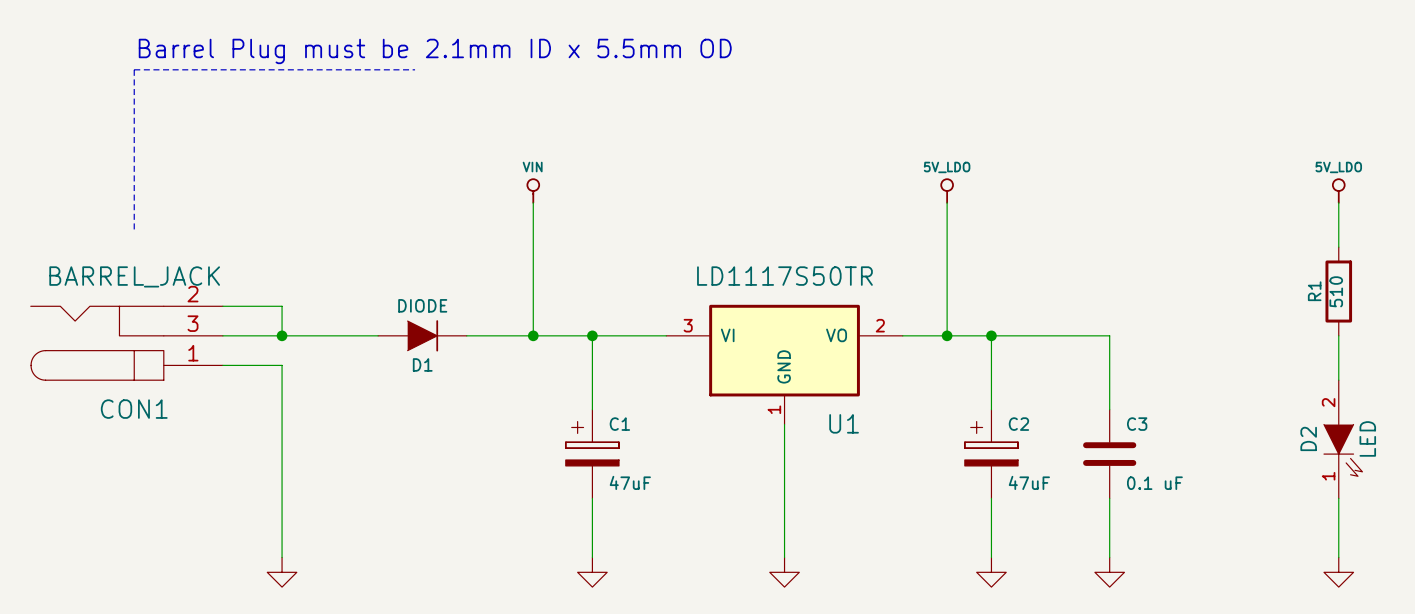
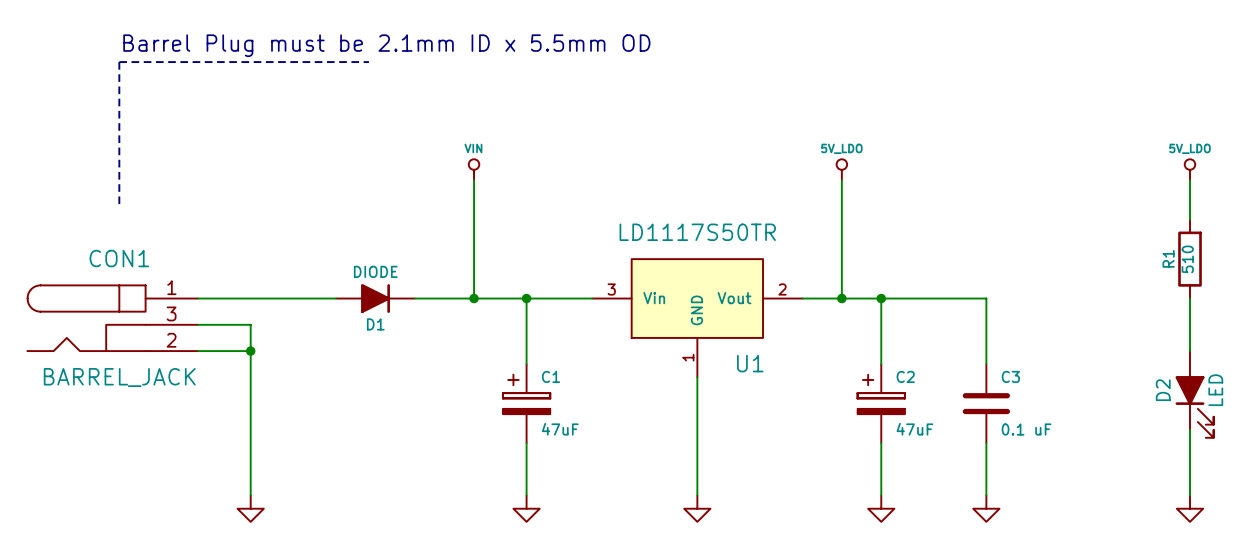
U1 symbol: [666, 304, 903, 425] -> [592, 259, 803, 378]
wire: (222, 306) (282, 306) (282, 335) -> none
D1 symbol: [378, 320, 467, 352] -> [336, 284, 415, 313]
junction position: (282, 335) -> (250, 351)
CON1 flip: as is (97, 343) -> up-down (86, 318)
D2 symbol: [1323, 380, 1363, 499] -> [1175, 351, 1214, 438]
wire: none -> (198, 351) (250, 351)

